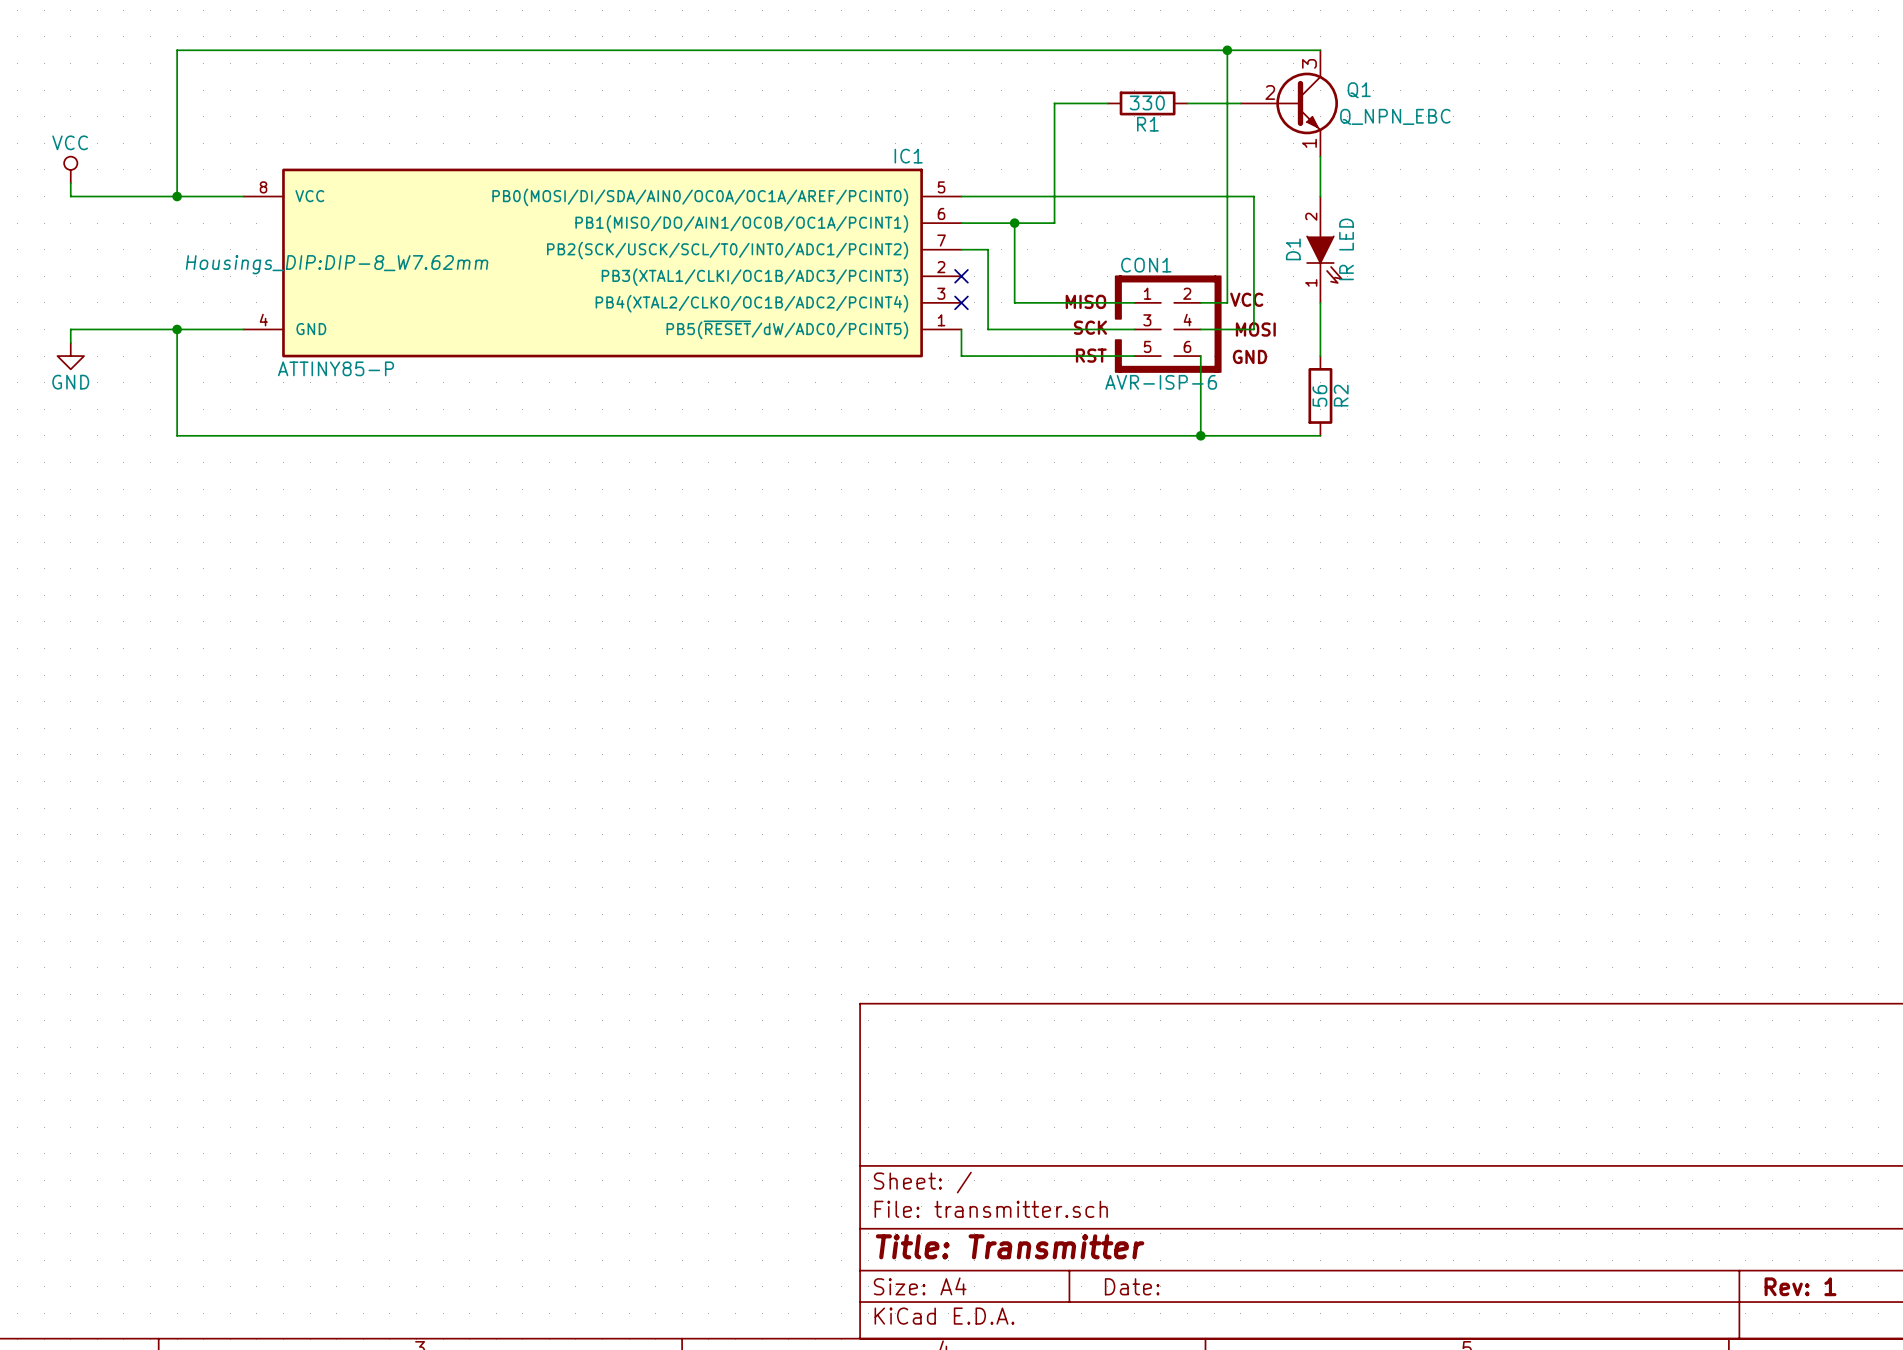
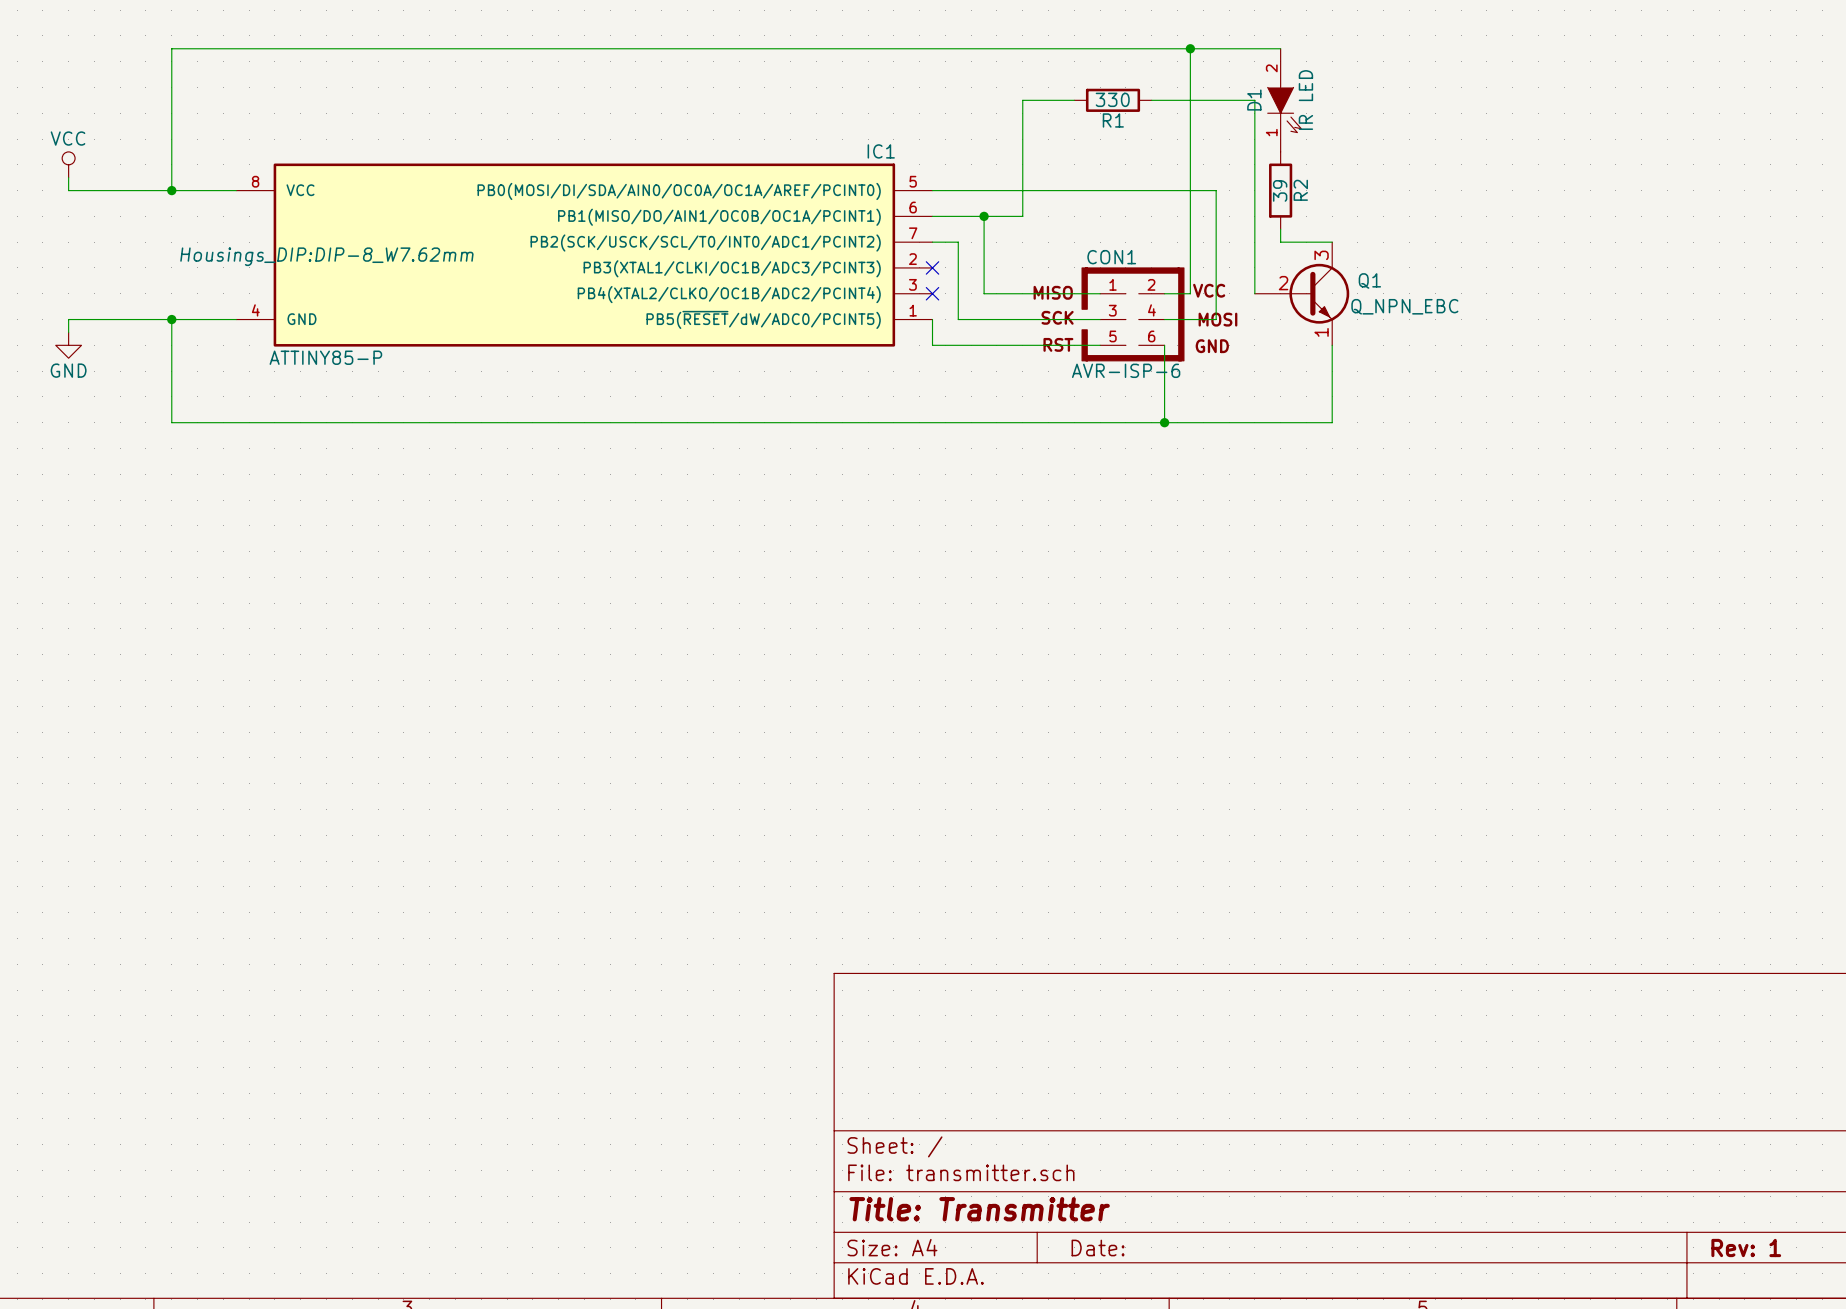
wire: none -> (1203, 100) (1254, 100) (1254, 293)
Q1 position: (1289, 103) -> (1302, 293)
wire: (1320, 156) (1320, 196) -> none
wire: none -> (1280, 229) (1280, 242) (1332, 242)
D1 position: (1324, 249) -> (1284, 100)
wire: (1320, 302) (1320, 356) -> none
wire: none -> (1332, 345) (1332, 422) (1280, 422)
R2 value: 56 (1319, 395) -> 39 (1280, 190)
R2 position: (1320, 395) -> (1280, 190)

